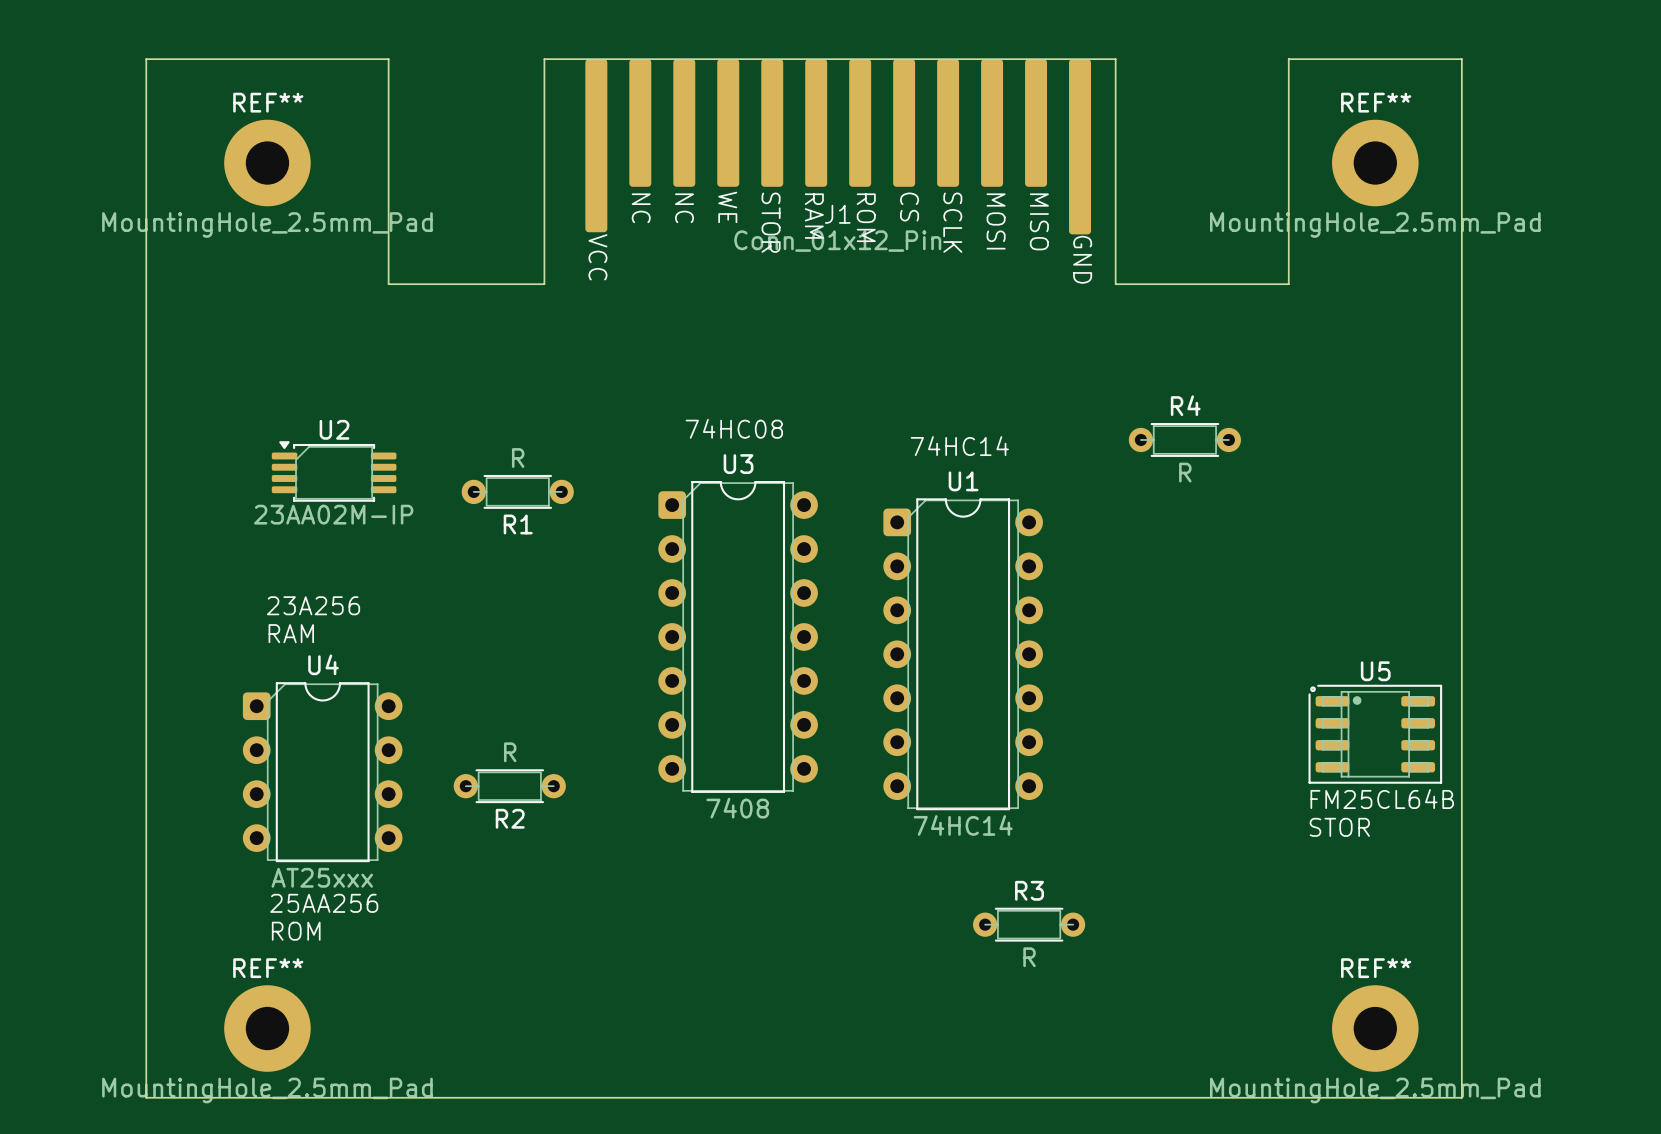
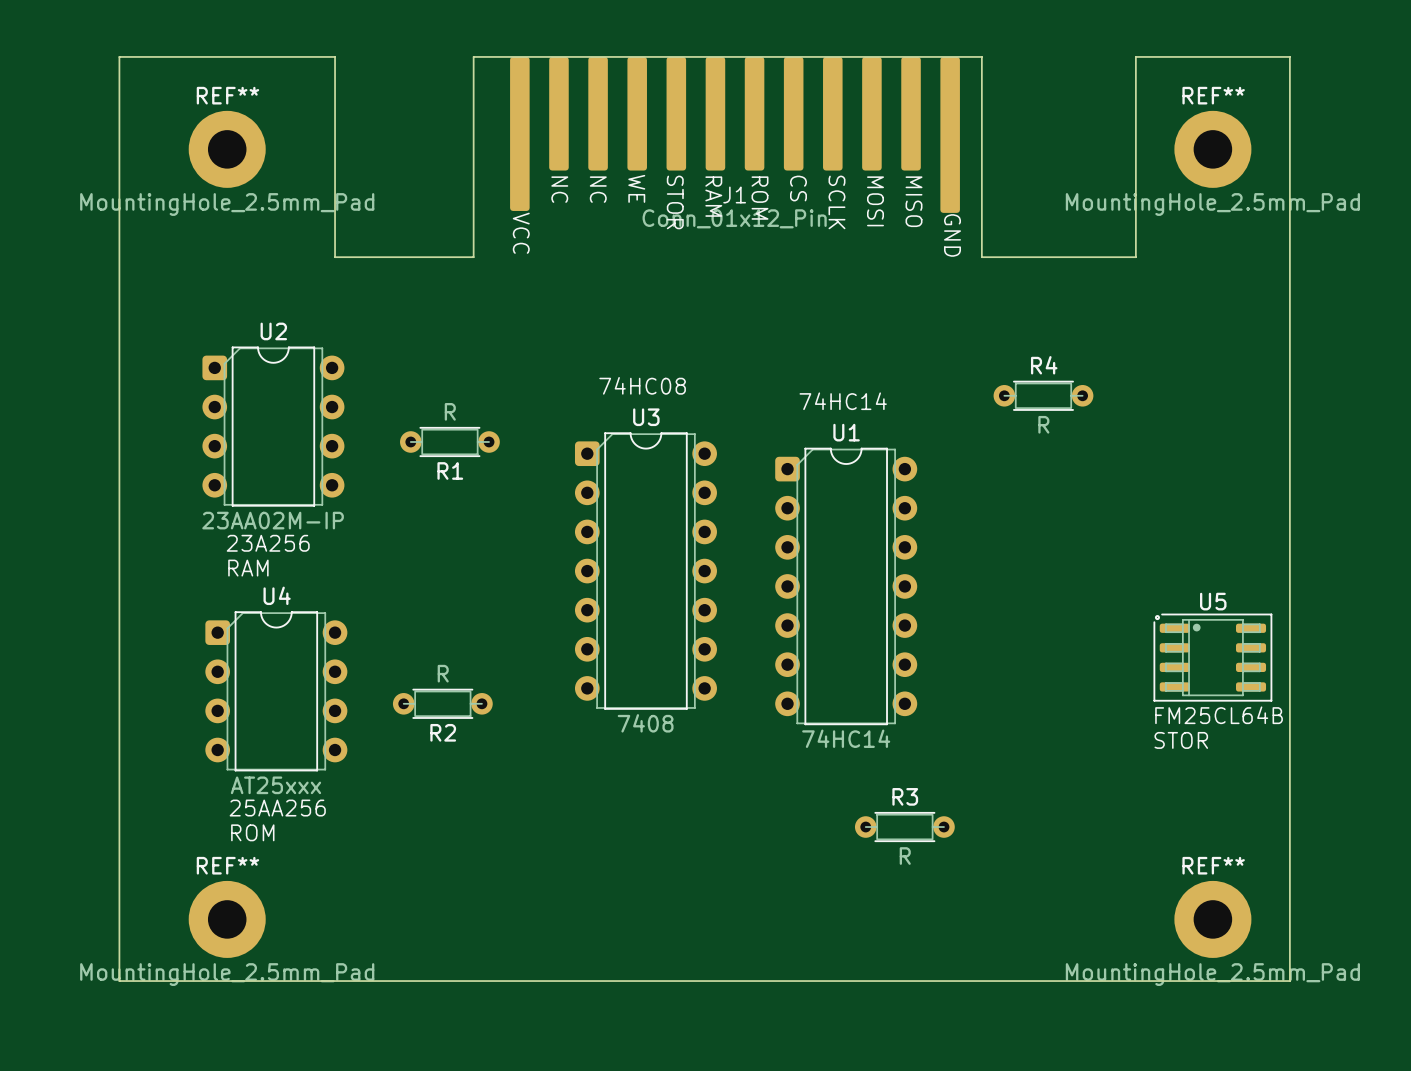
U2 name position: U2 (334, 429) -> U2 (273, 331)
U2 footprint: [271, 441, 397, 502] -> [202, 346, 345, 507]
U2 value position: 23AA02M-IP (333, 514) -> 23AA02M-IP (273, 520)

